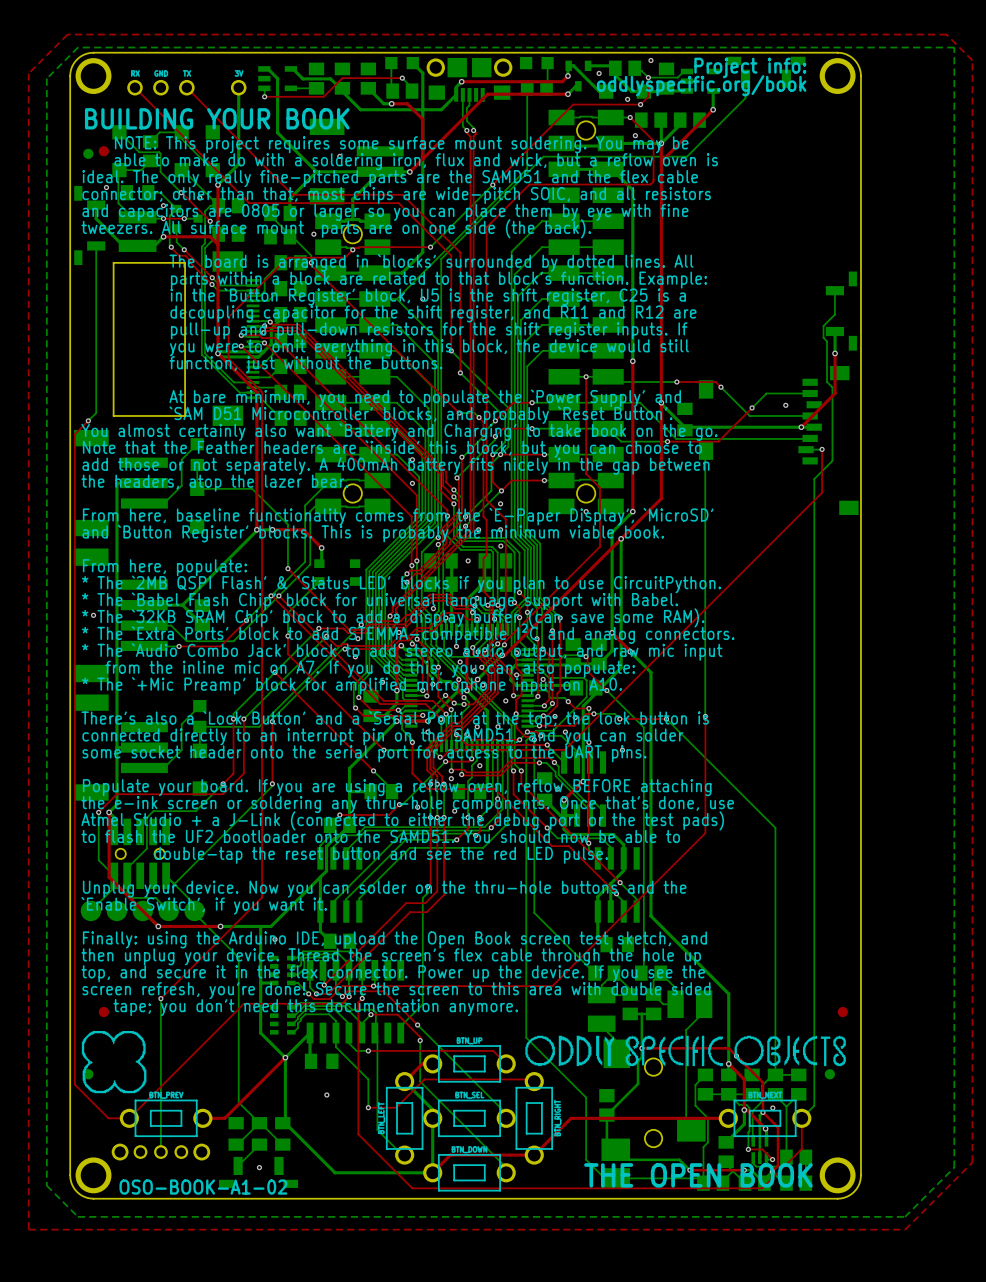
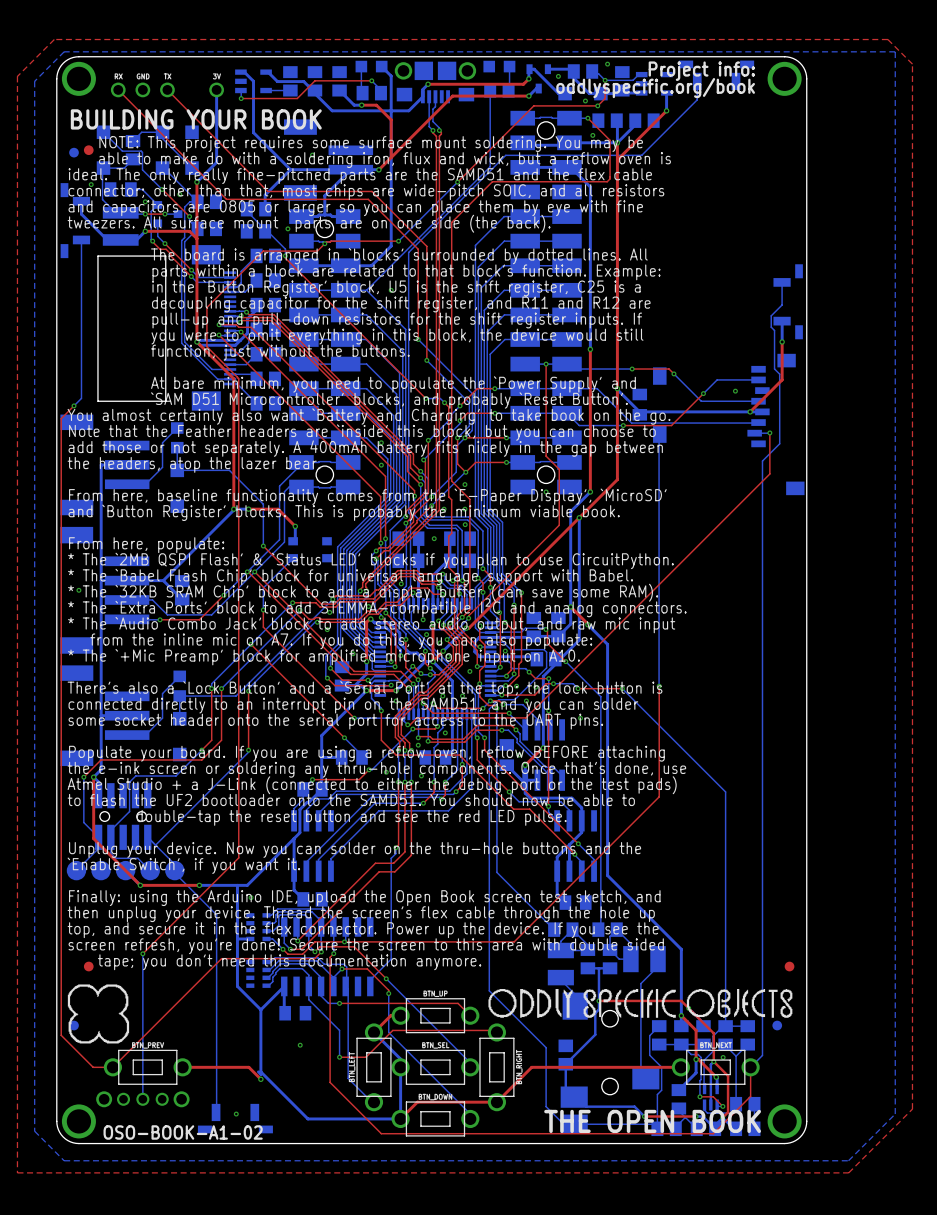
top track: (285, 1057) (224, 1118) -> (260, 1079) (248, 1067) (203, 1067)
via: (285, 1057) -> none
bottom track: (238, 1102) (262, 1125) -> (216, 1052) (216, 1111)
via: none -> (260, 1079)
part: (236, 1133) -> none
part: (259, 1133) -> none
part: (282, 1133) -> none
bottom track: (236, 1144) (256, 1125) (263, 1125) (282, 1144) -> none
bottom track: (259, 1144) (238, 1165) -> none

